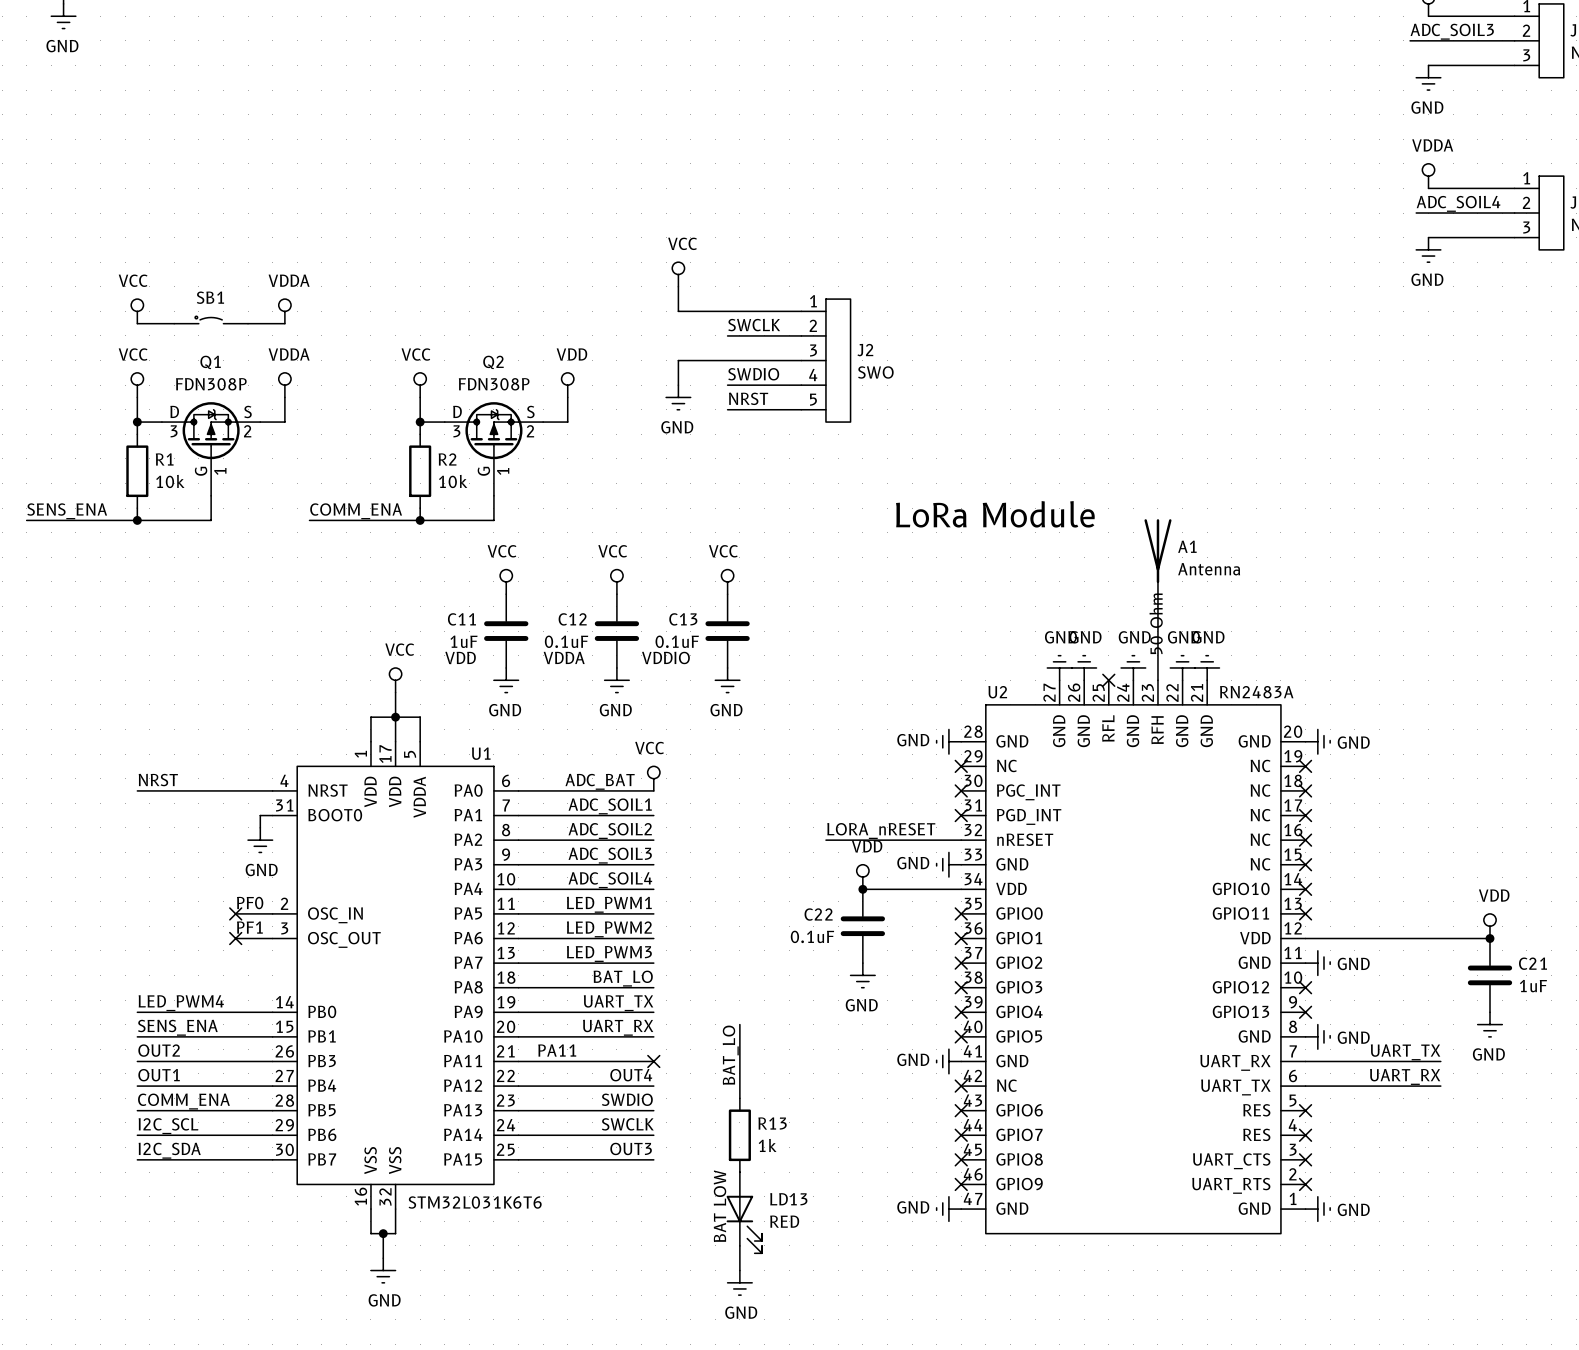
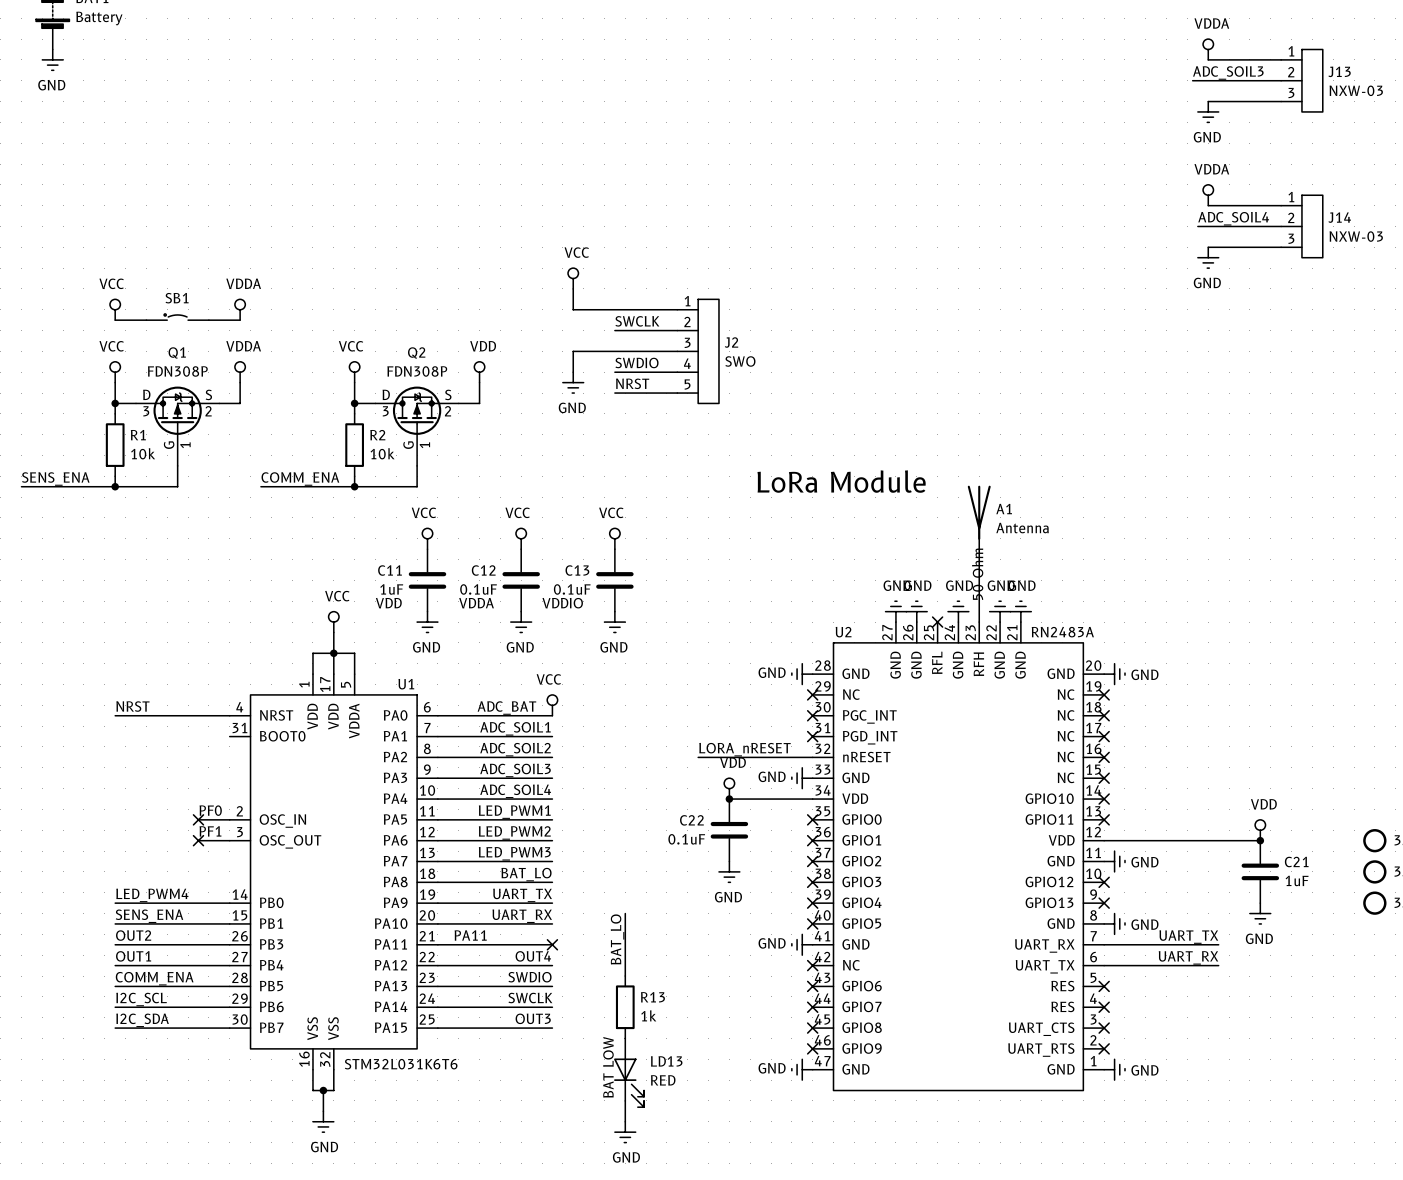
wire: (272, 815) (260, 815) (260, 827) -> none
power symbol: GND (260, 840) -> none

